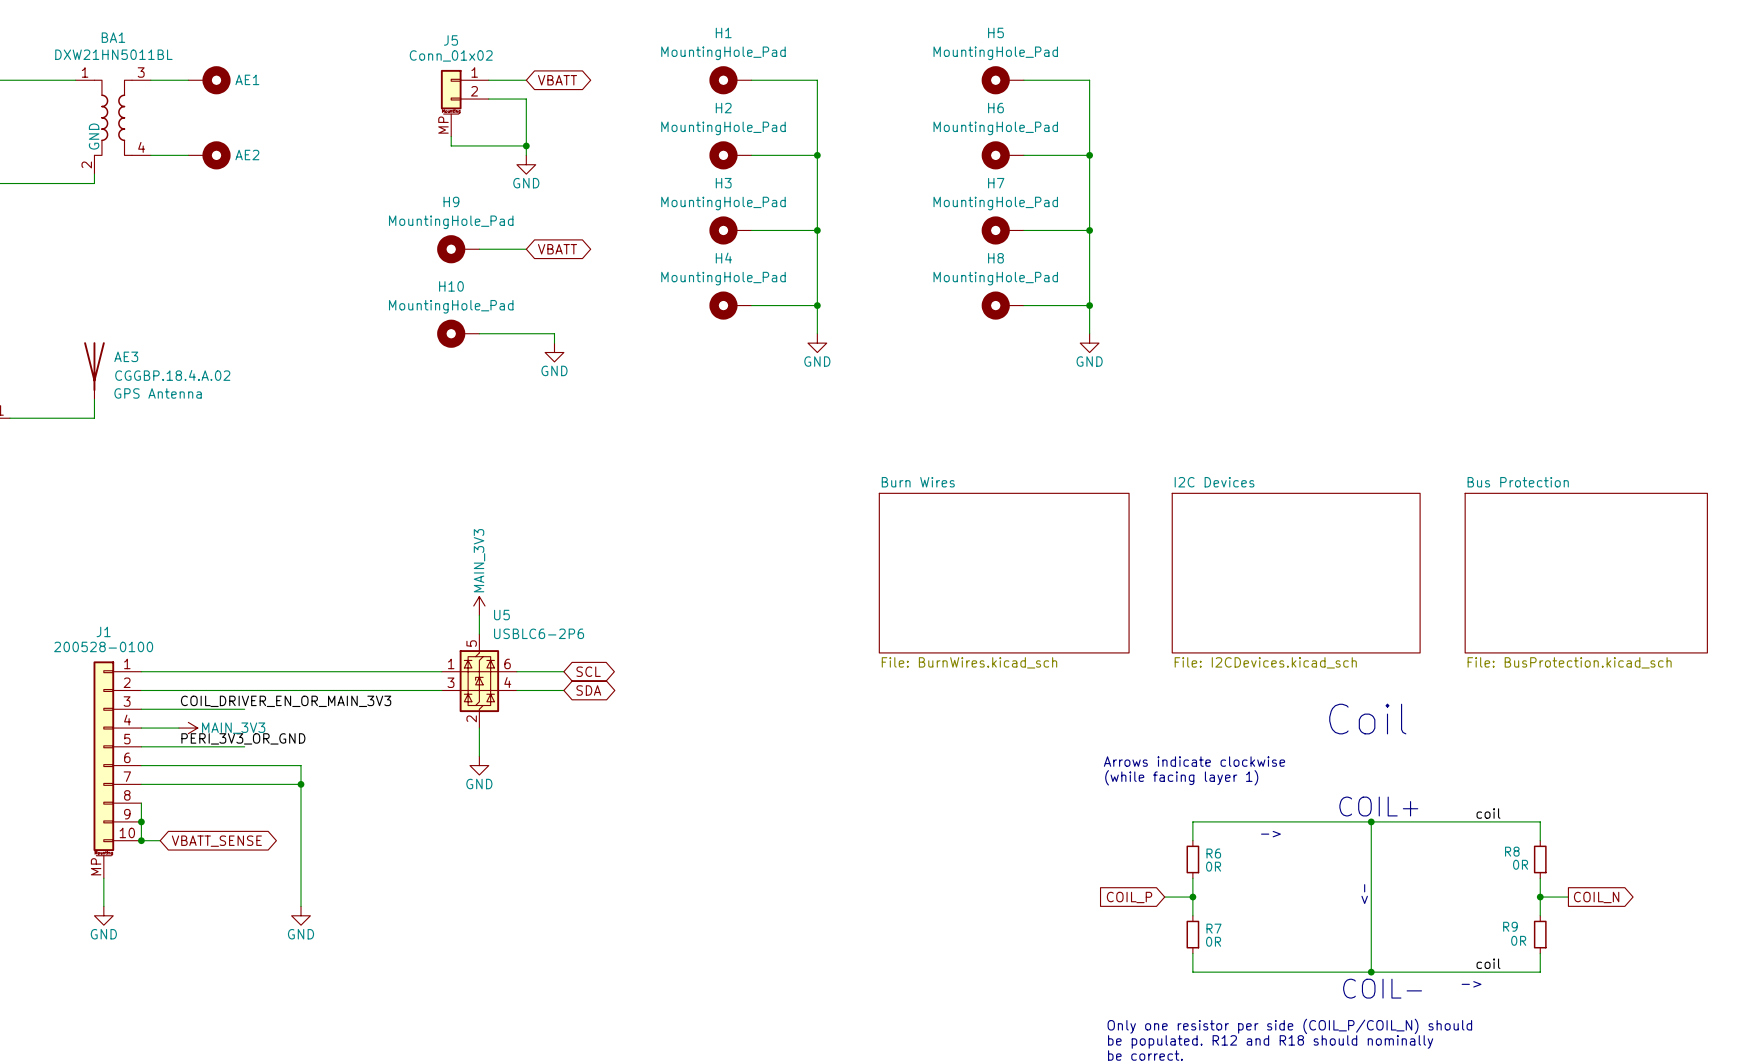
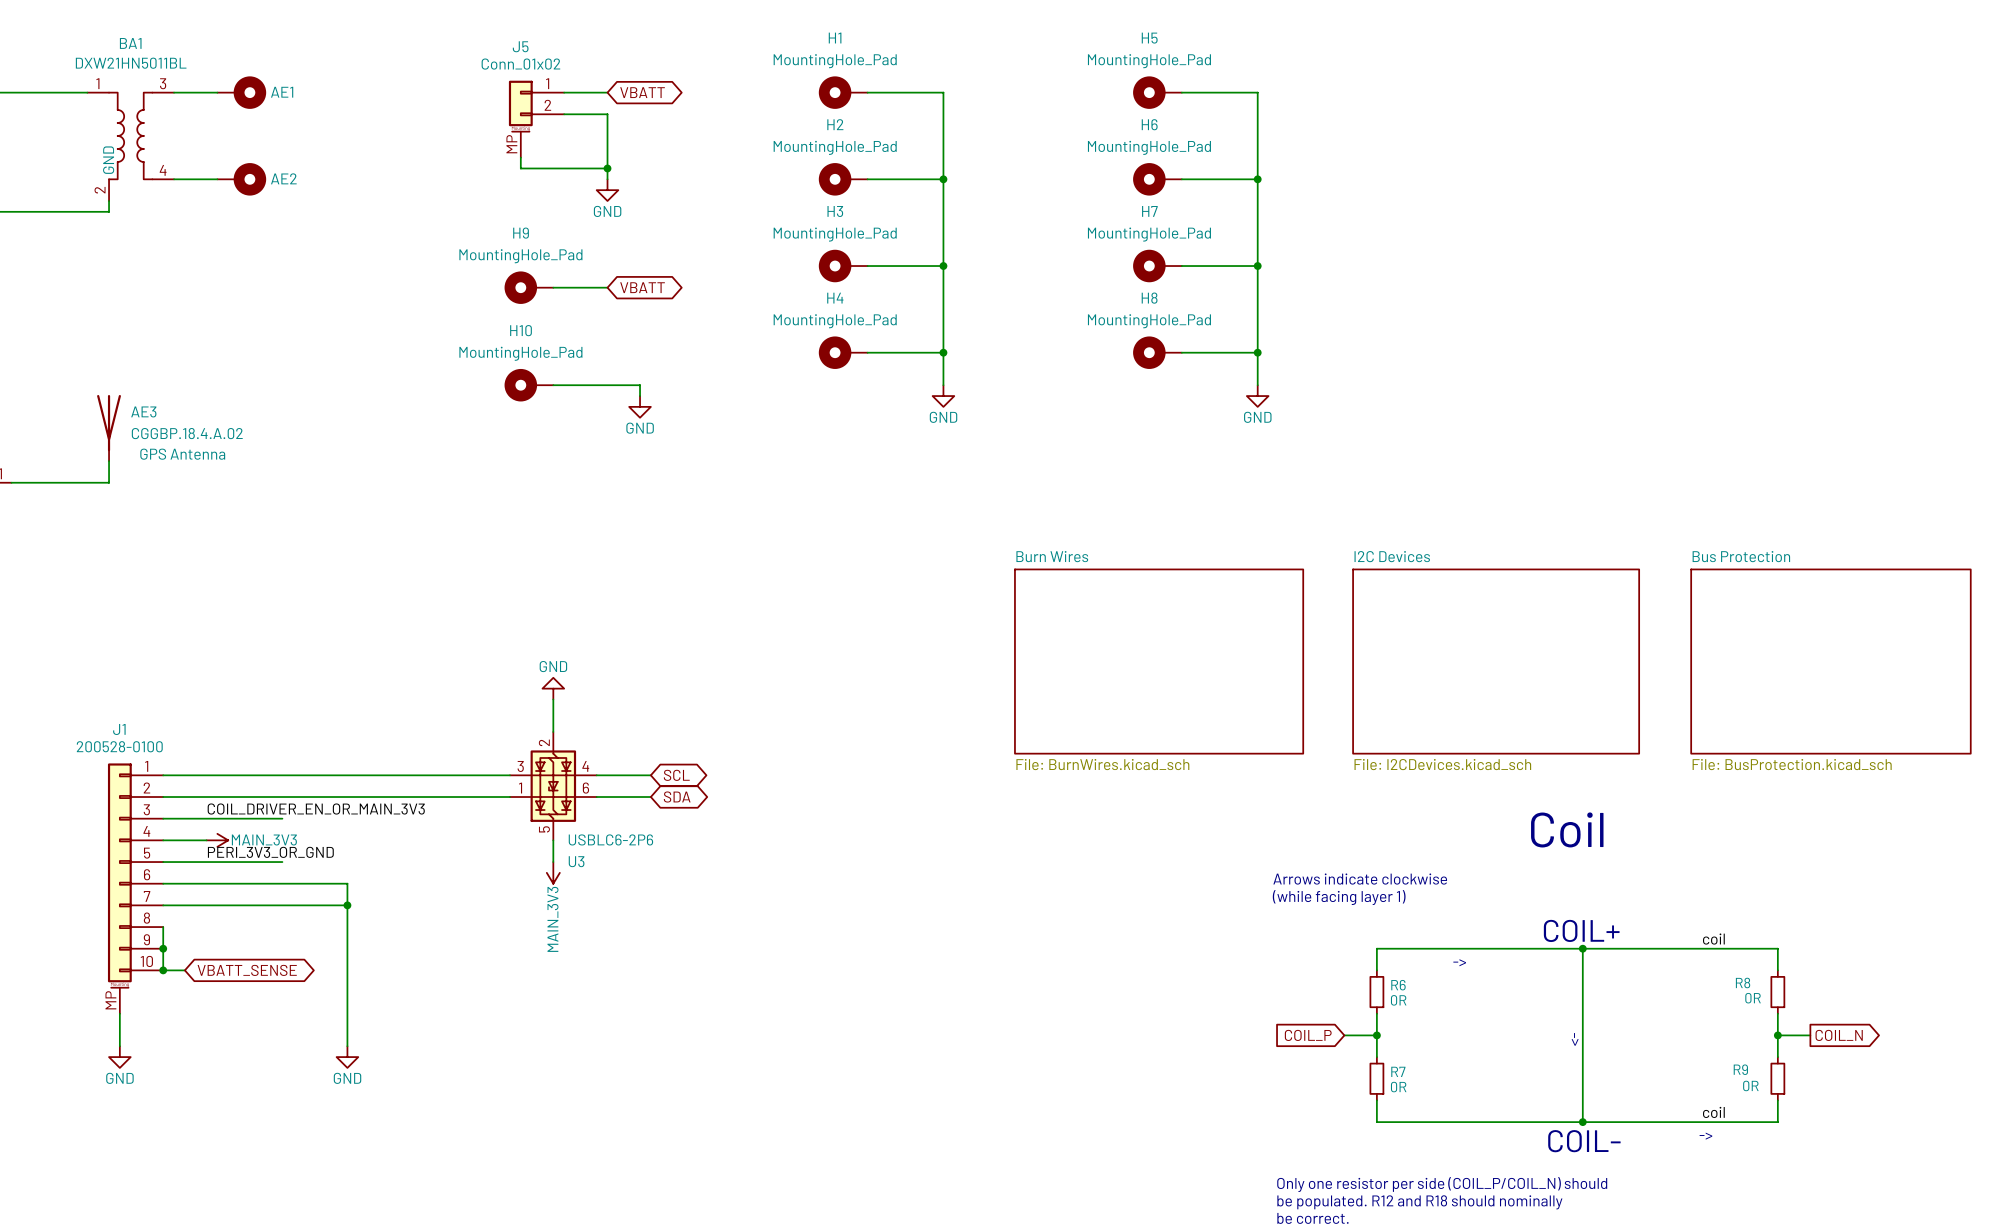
power symbol rotation: 0° (479, 605) -> 180° (553, 872)
power symbol position: MAIN_3V3 (479, 605) -> MAIN_3V3 (553, 872)
U5: USBLC6-2P6 (479, 681) -> none
U3: none -> USBLC6-2P6 (553, 786)
power symbol rotation: 0° (479, 765) -> 180° (553, 688)
power symbol position: GND (479, 765) -> GND (553, 688)

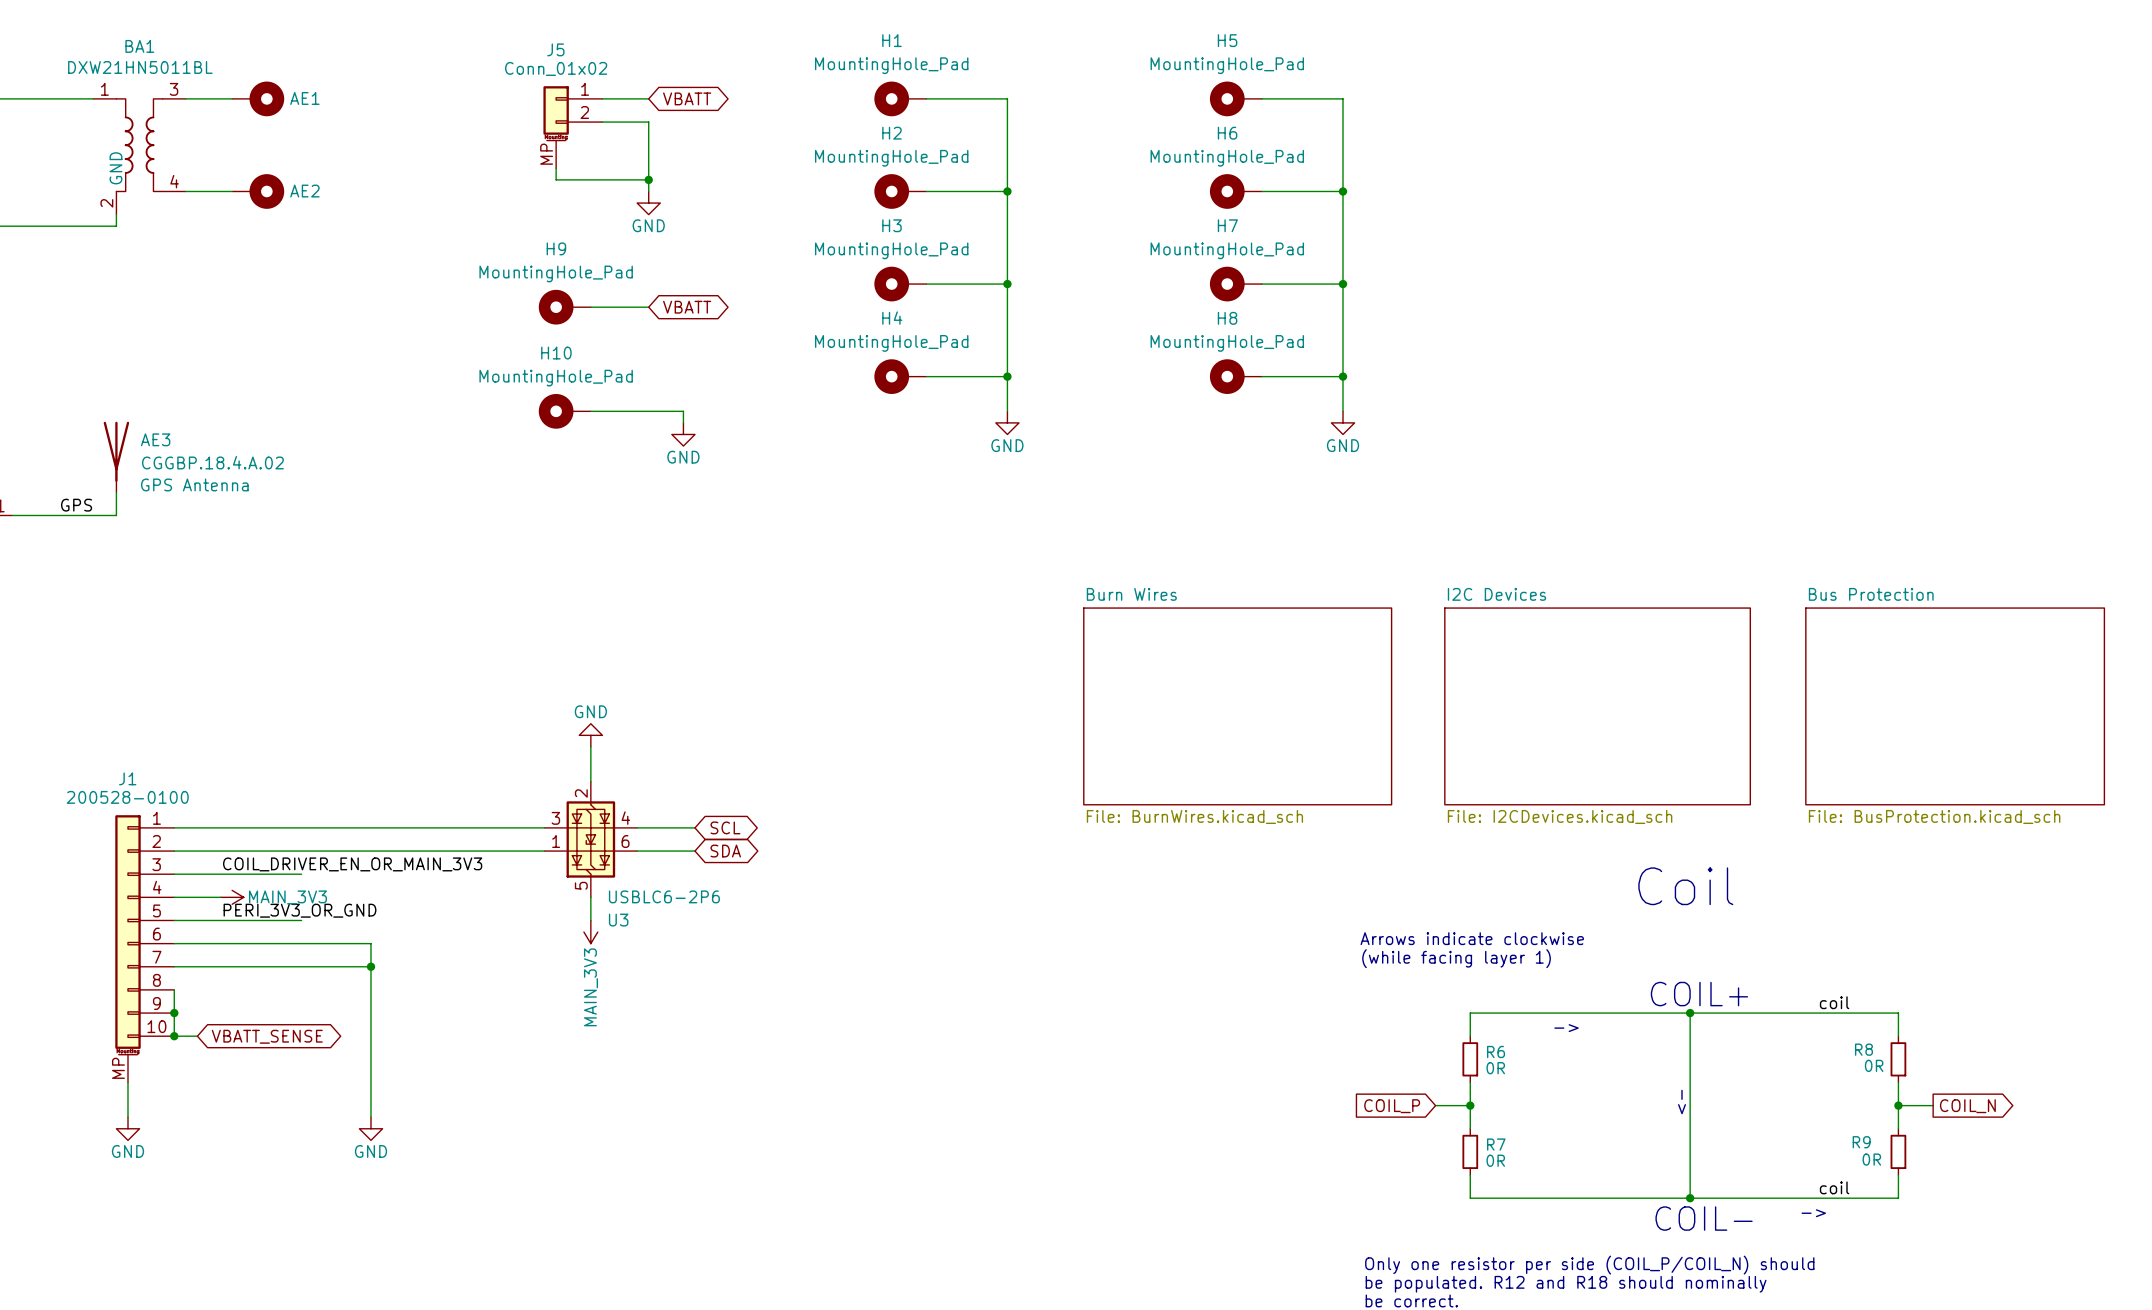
label: none -> GPS (76, 505)

